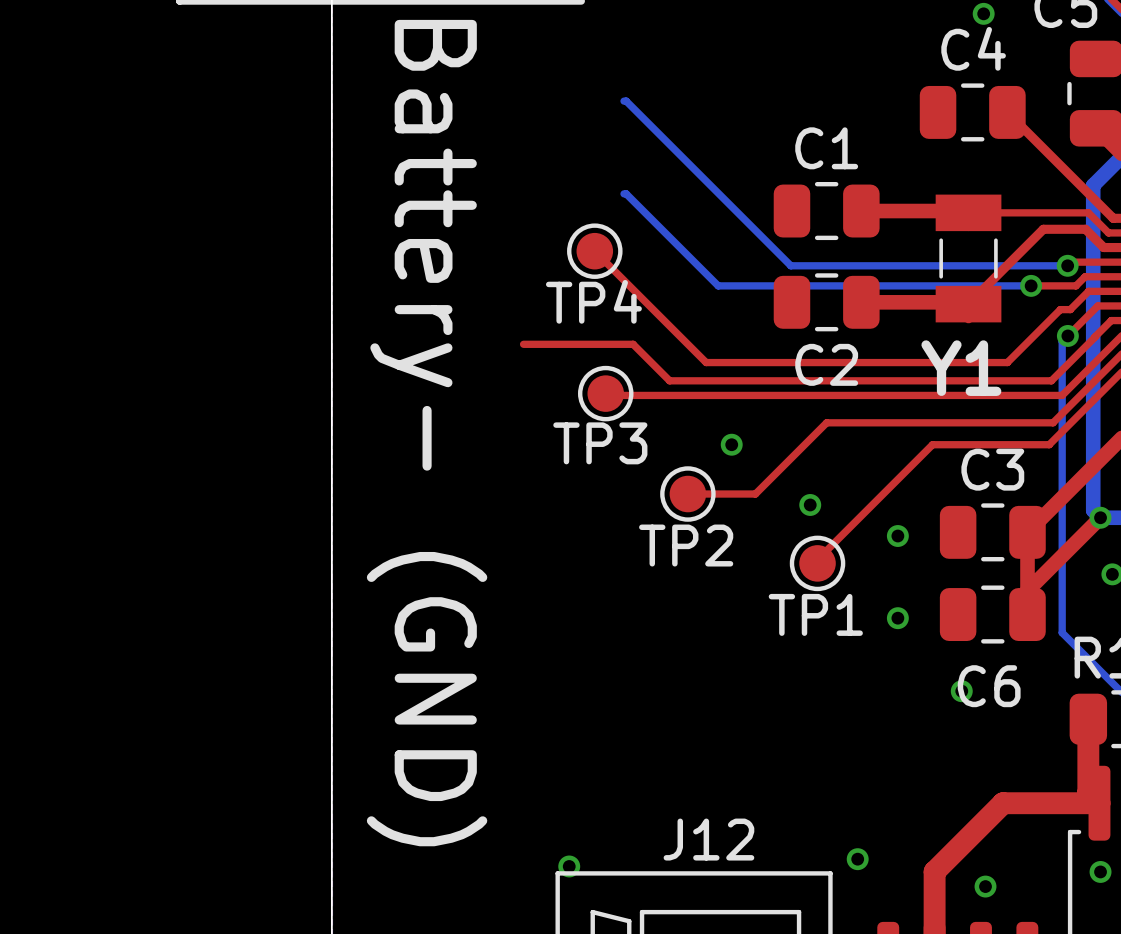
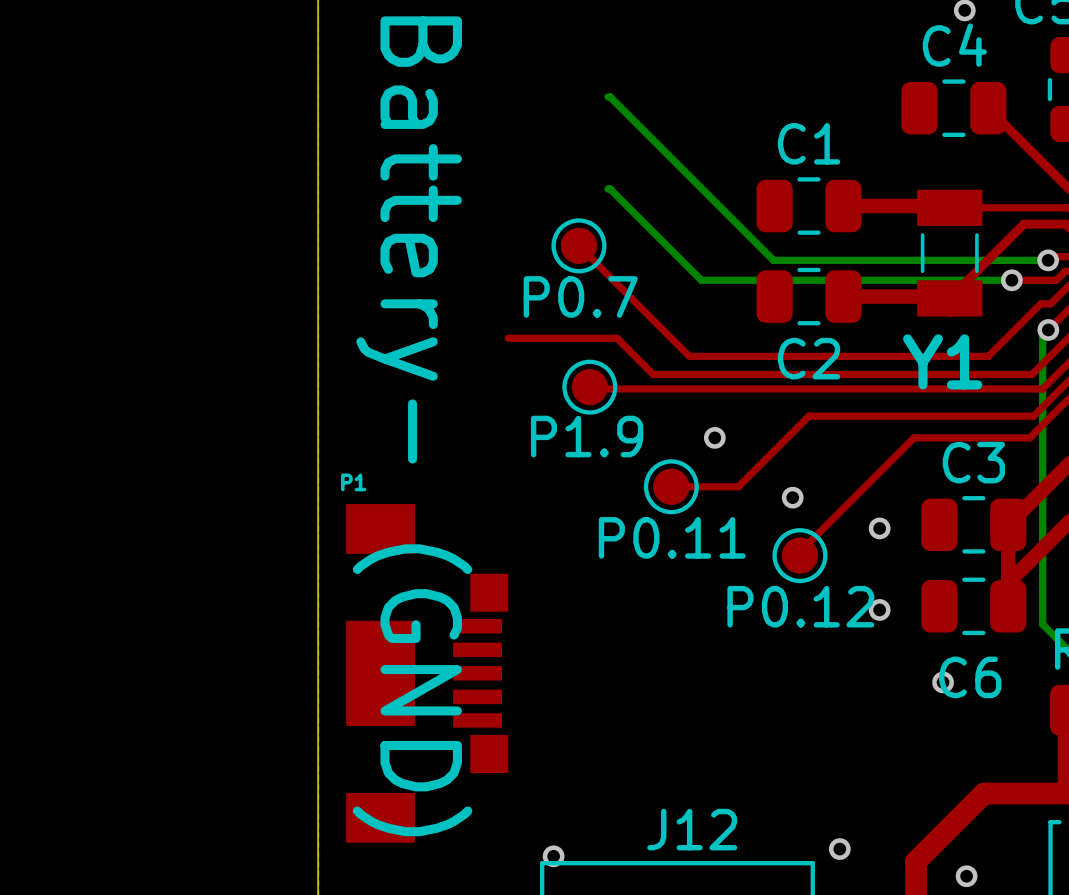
TP4 name: TP4 (593, 301) -> P0.7 (580, 296)
TP3 name: TP3 (600, 443) -> P1.9 (587, 436)
TP2 name: TP2 (686, 545) -> P0.11 (672, 537)
TP1 name: TP1 (815, 614) -> P0.12 (800, 606)
P1: none -> (427, 673)

